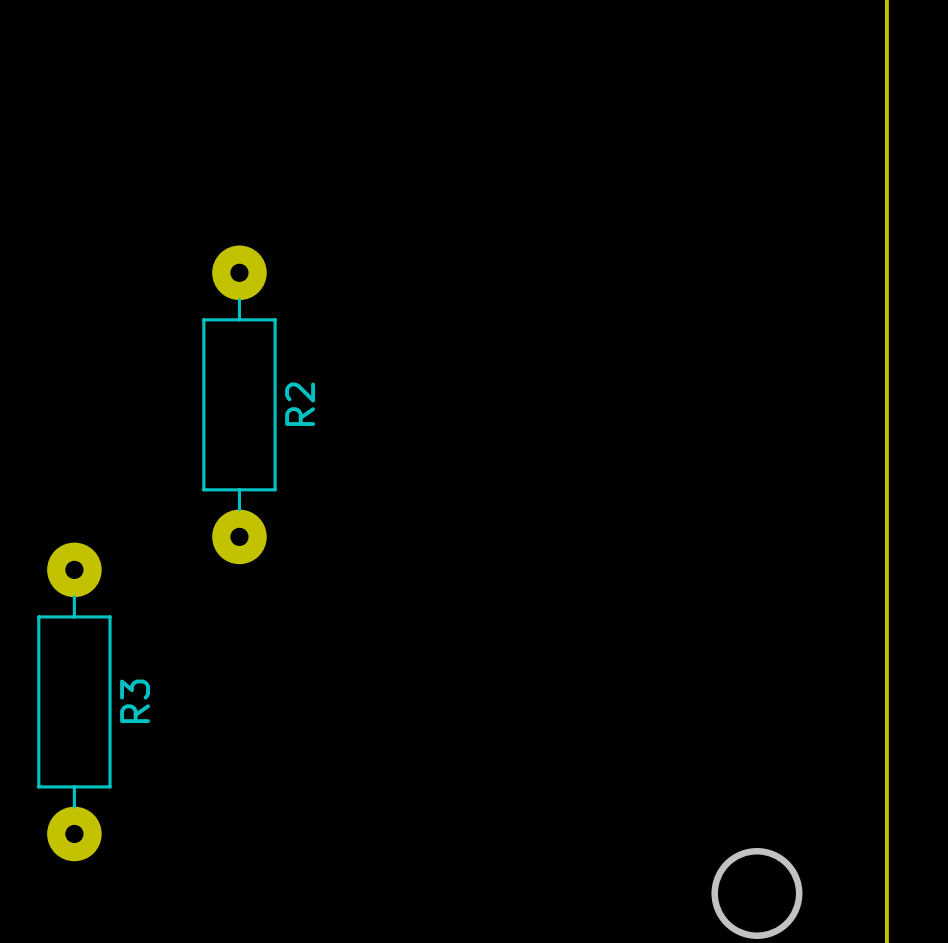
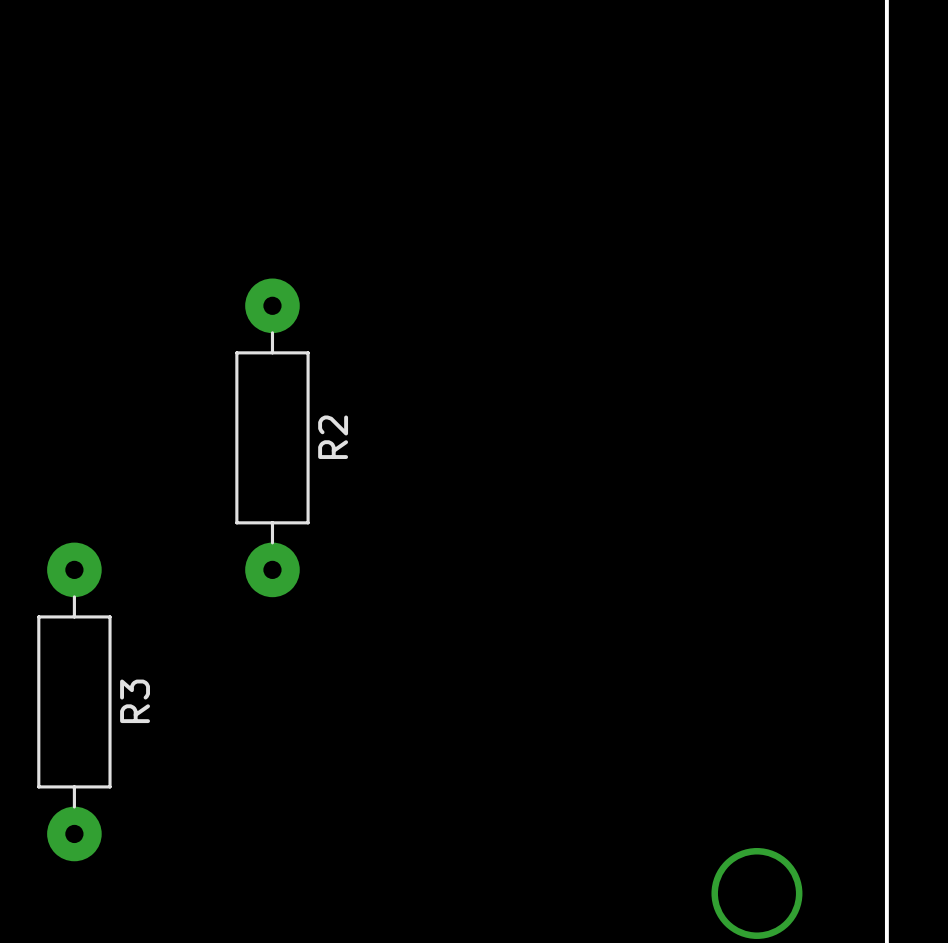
R2 position: (239, 404) -> (272, 437)

